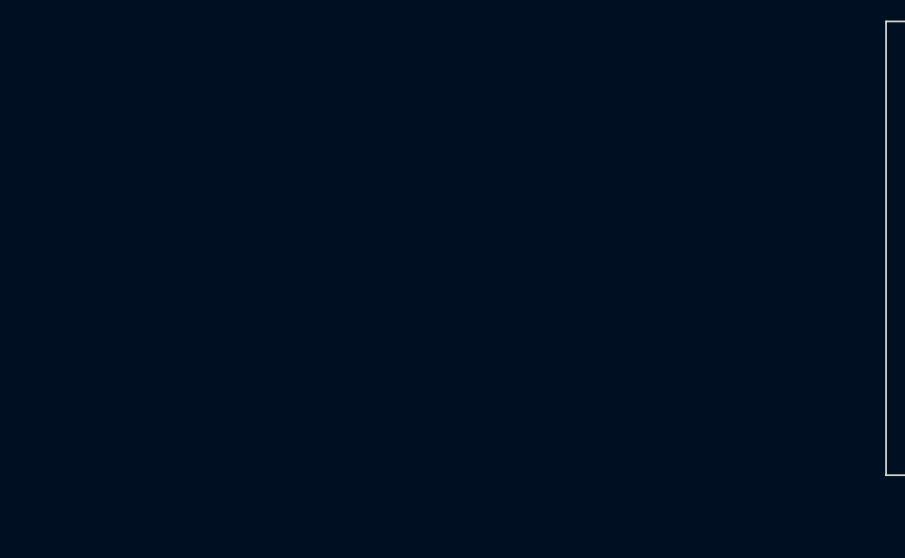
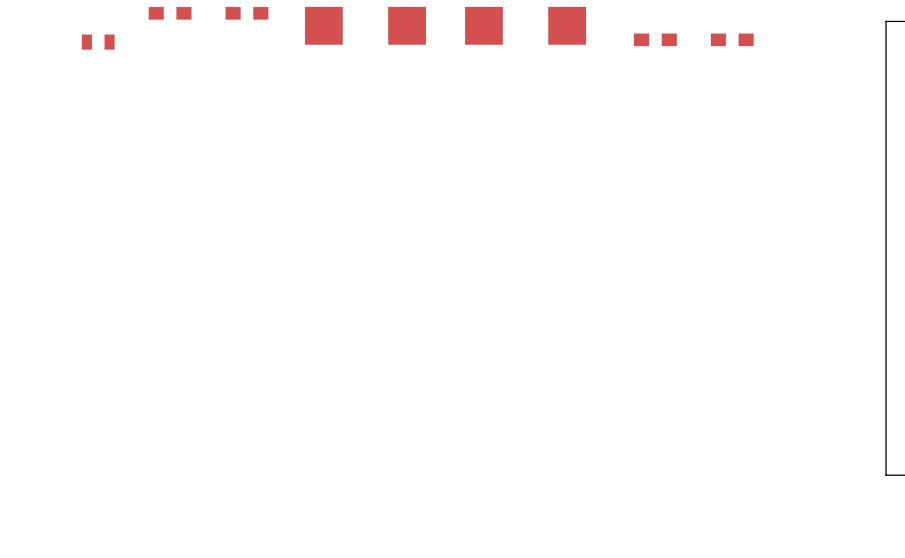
part: none -> (170, 13)
part: none -> (246, 13)
part: none -> (365, 25)
part: none -> (525, 25)
part: none -> (655, 39)
part: none -> (732, 39)
part: none -> (98, 42)

